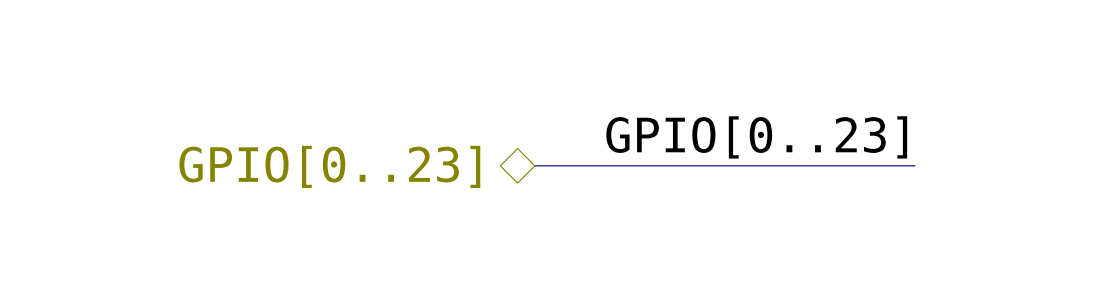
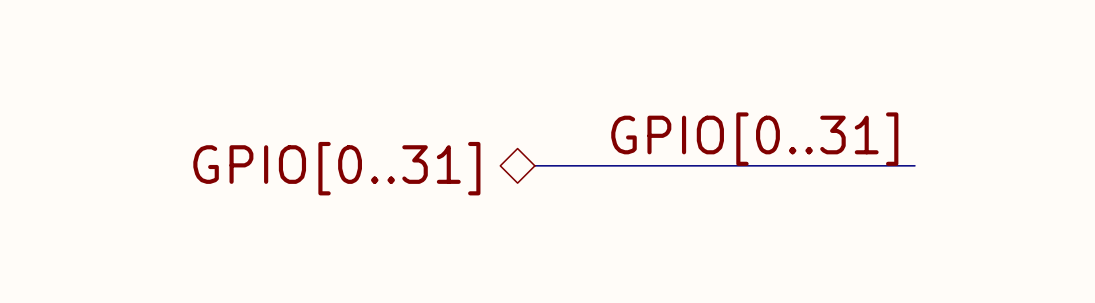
label: GPIO[0..23] (756, 137) -> GPIO[0..31] (754, 139)
hierarchical label: GPIO[0..23] (329, 166) -> GPIO[0..31] (336, 168)

